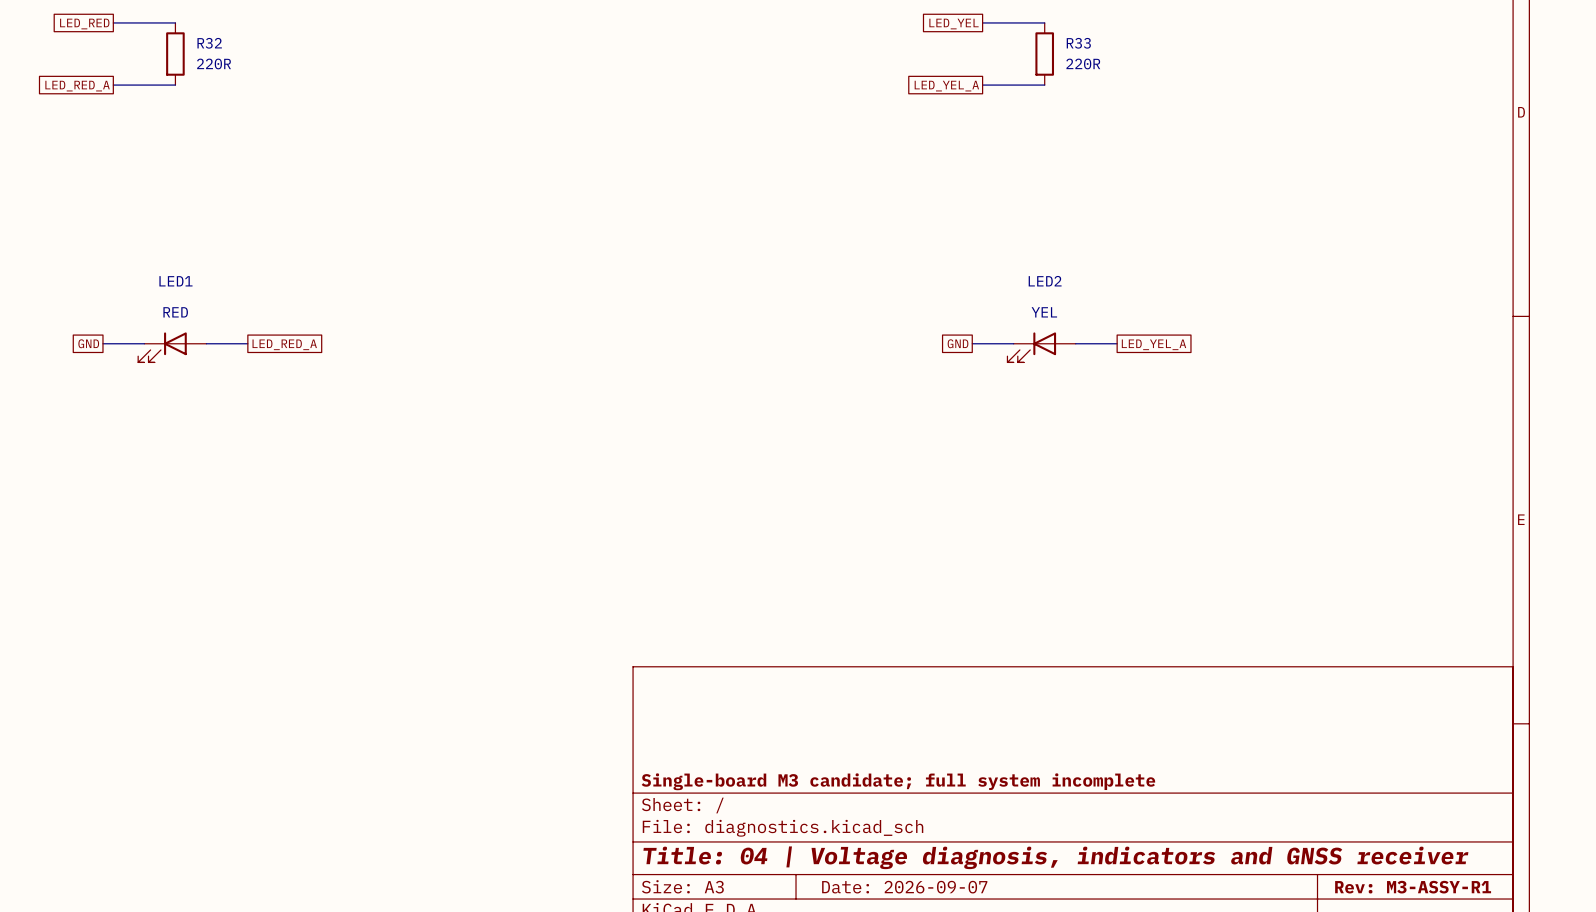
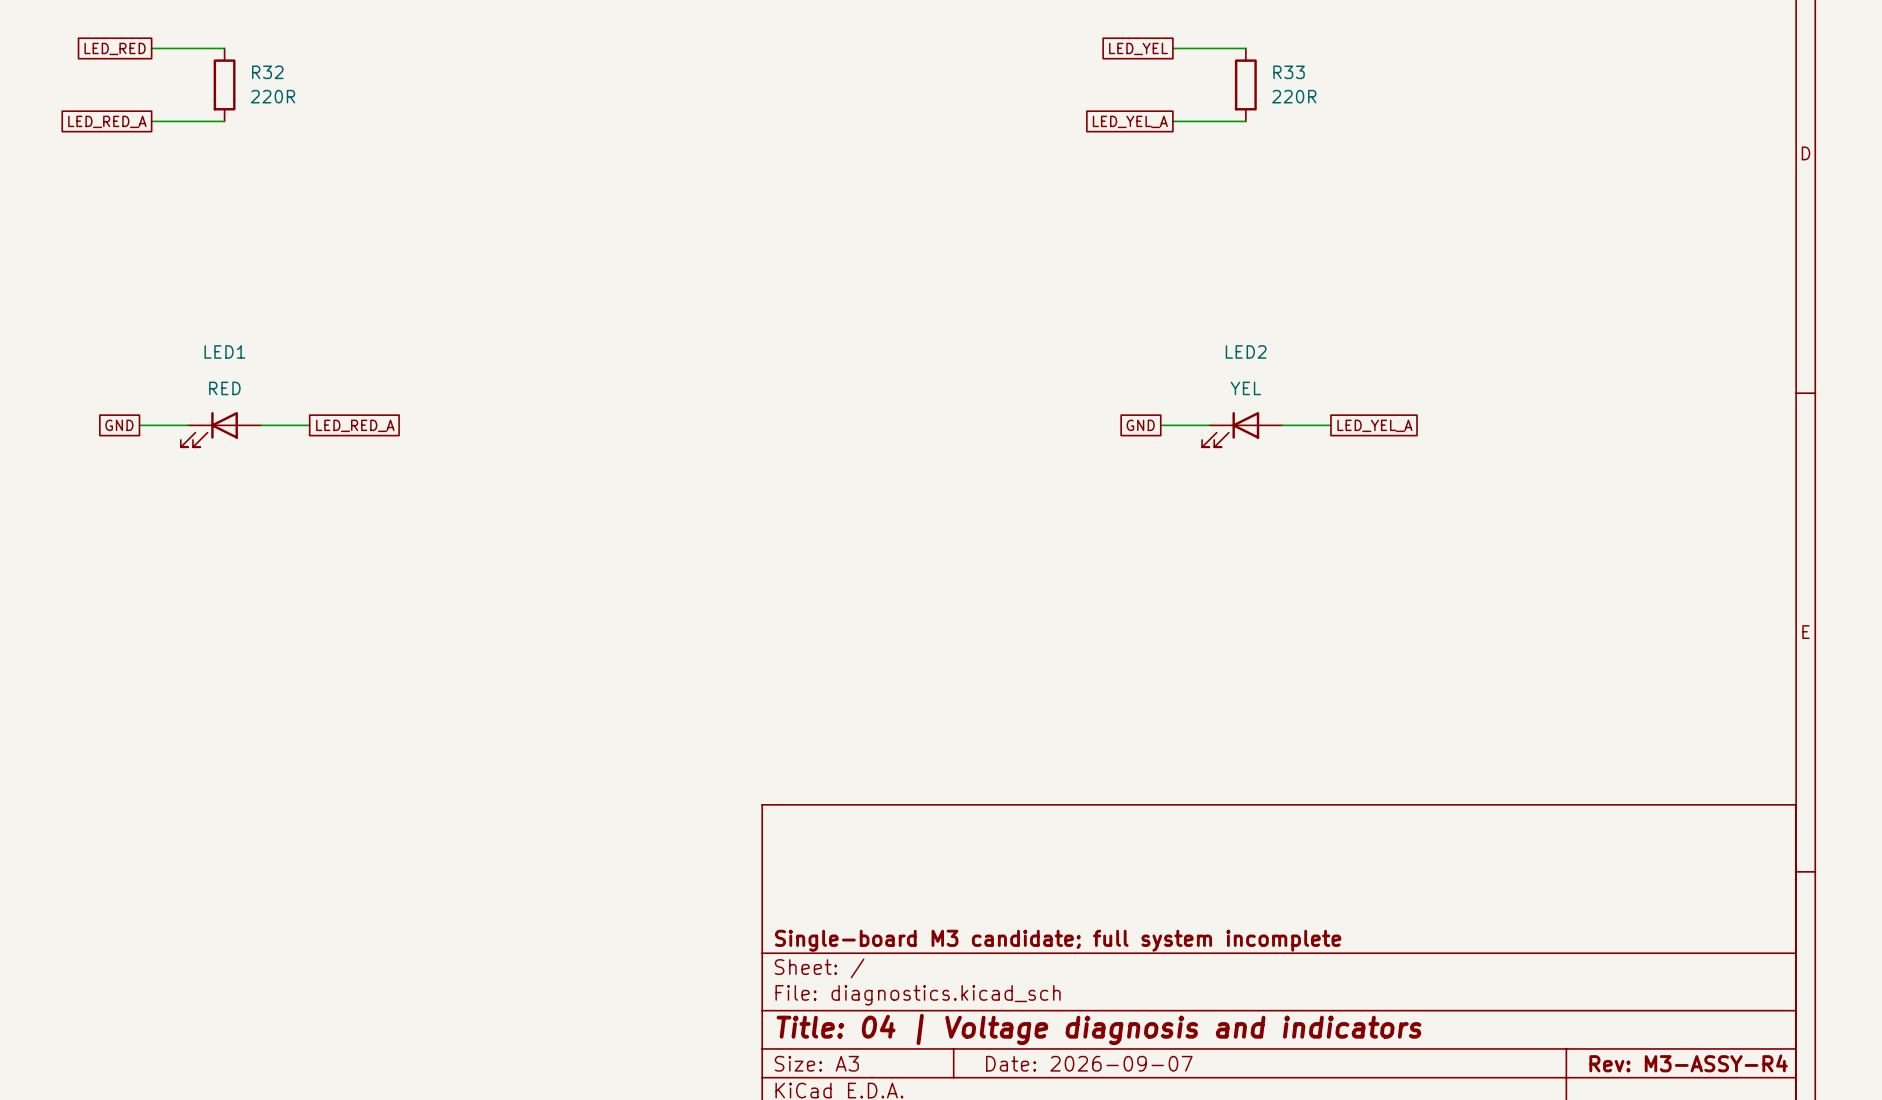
title block: Title: 04 | Voltage diagnosis, indicators and GNSS receiver (1055, 857) -> Title: 04 | Voltage diagnosis and indicators (1099, 1029)
title block: Rev: M3-ASSY-R1 (1413, 887) -> Rev: M3-ASSY-R4 (1688, 1063)

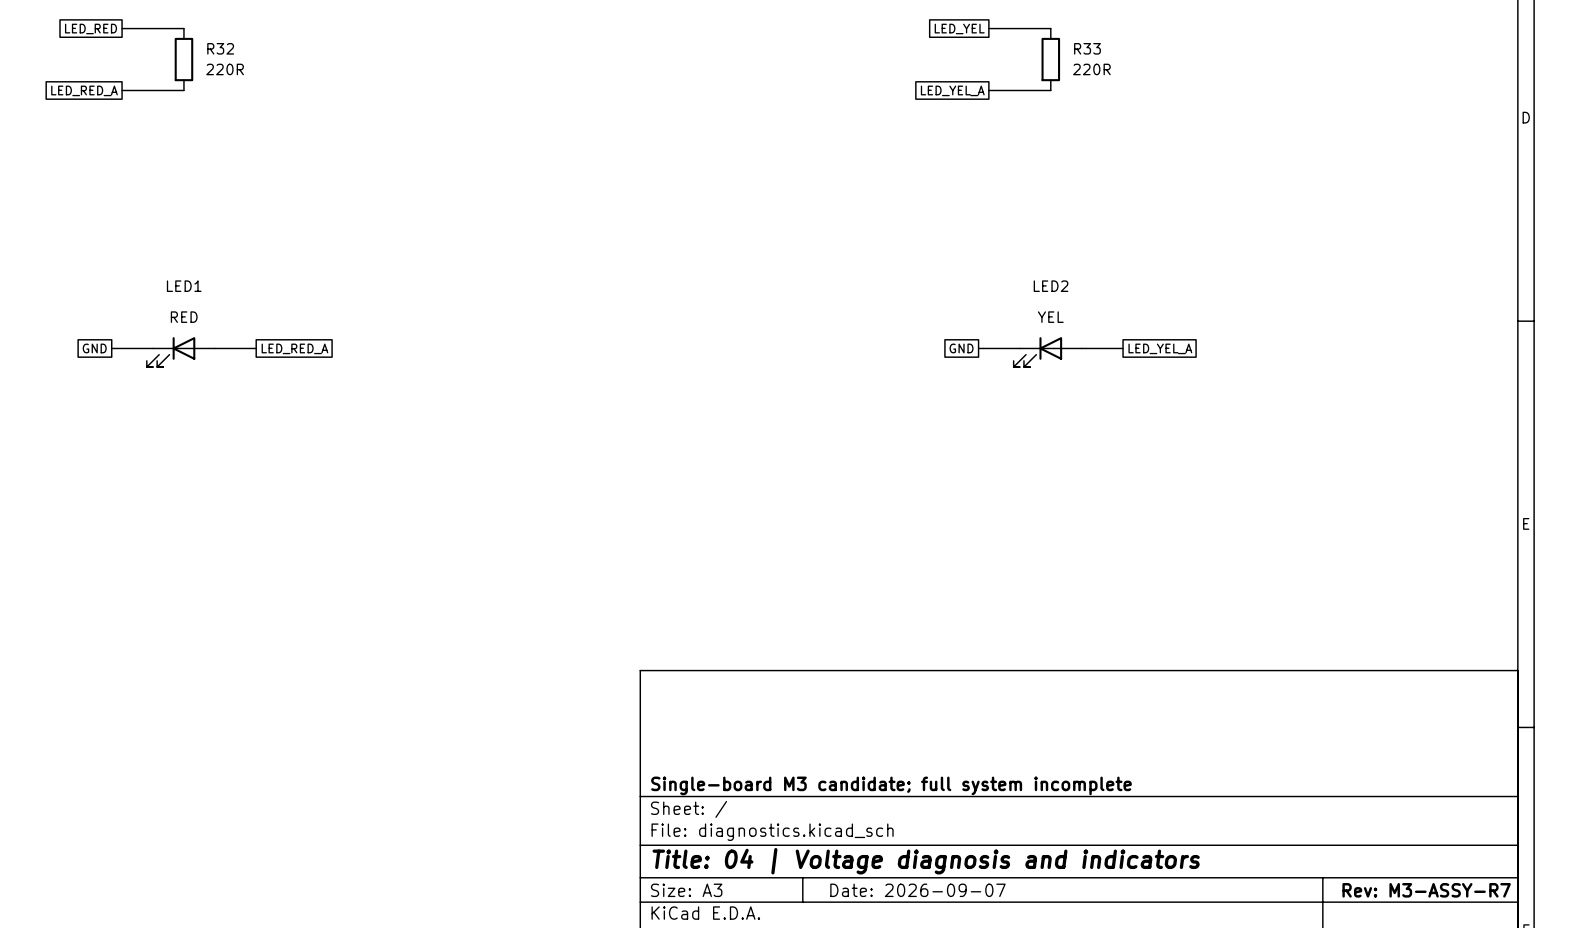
title block: Rev: M3-ASSY-R4 (1688, 1063) -> Rev: M3-ASSY-R7 (1426, 890)

